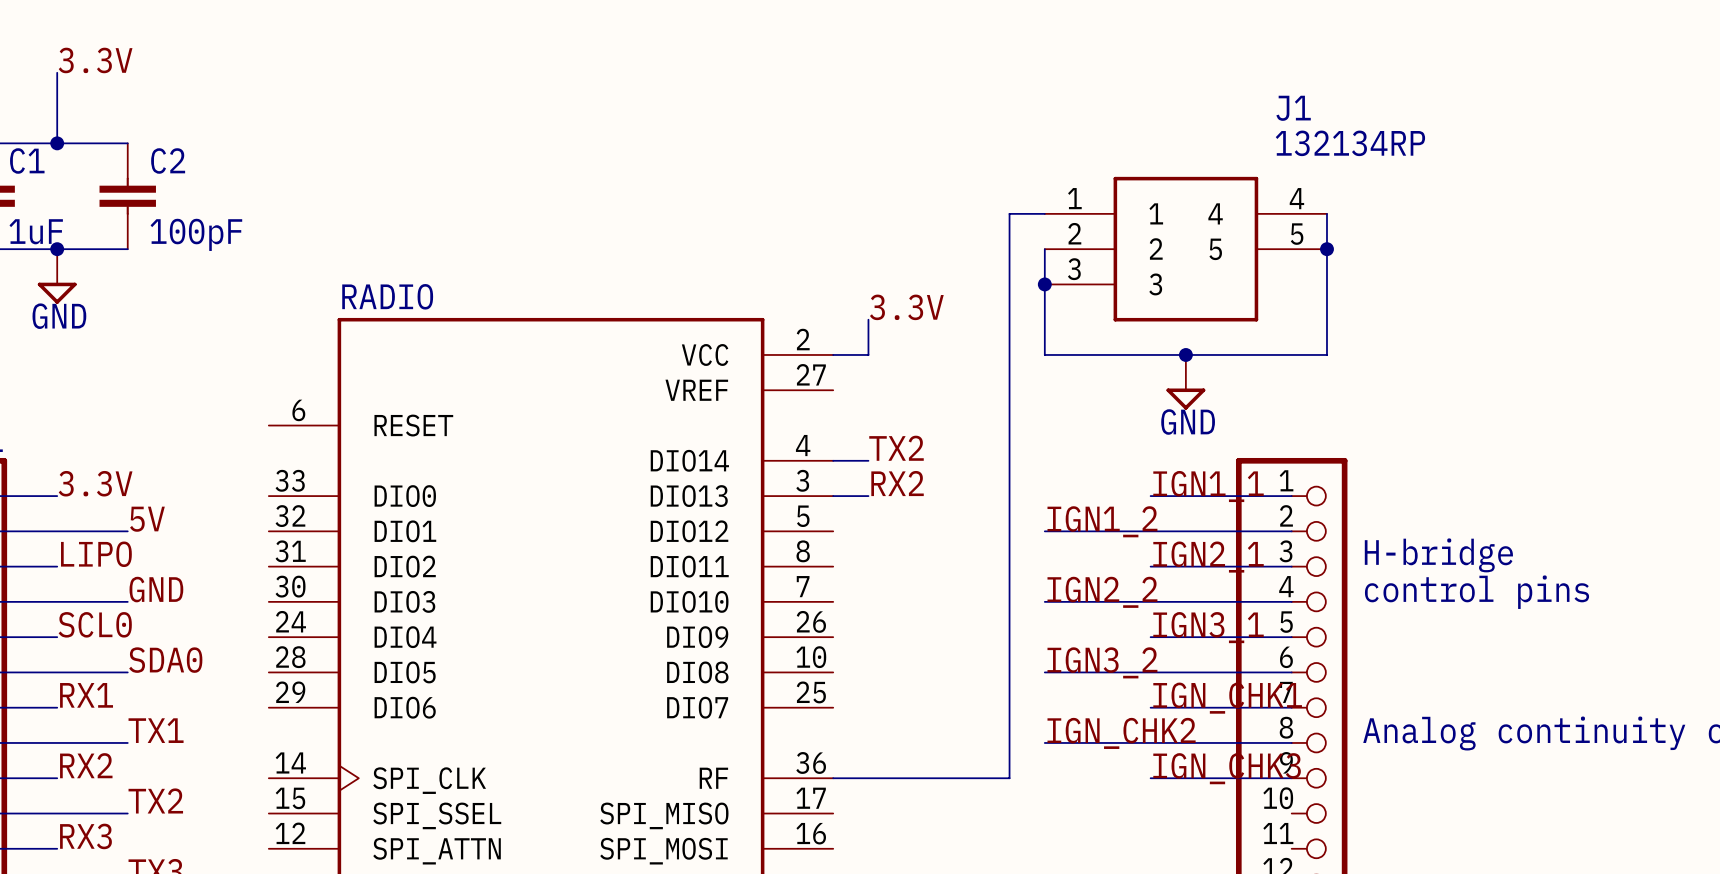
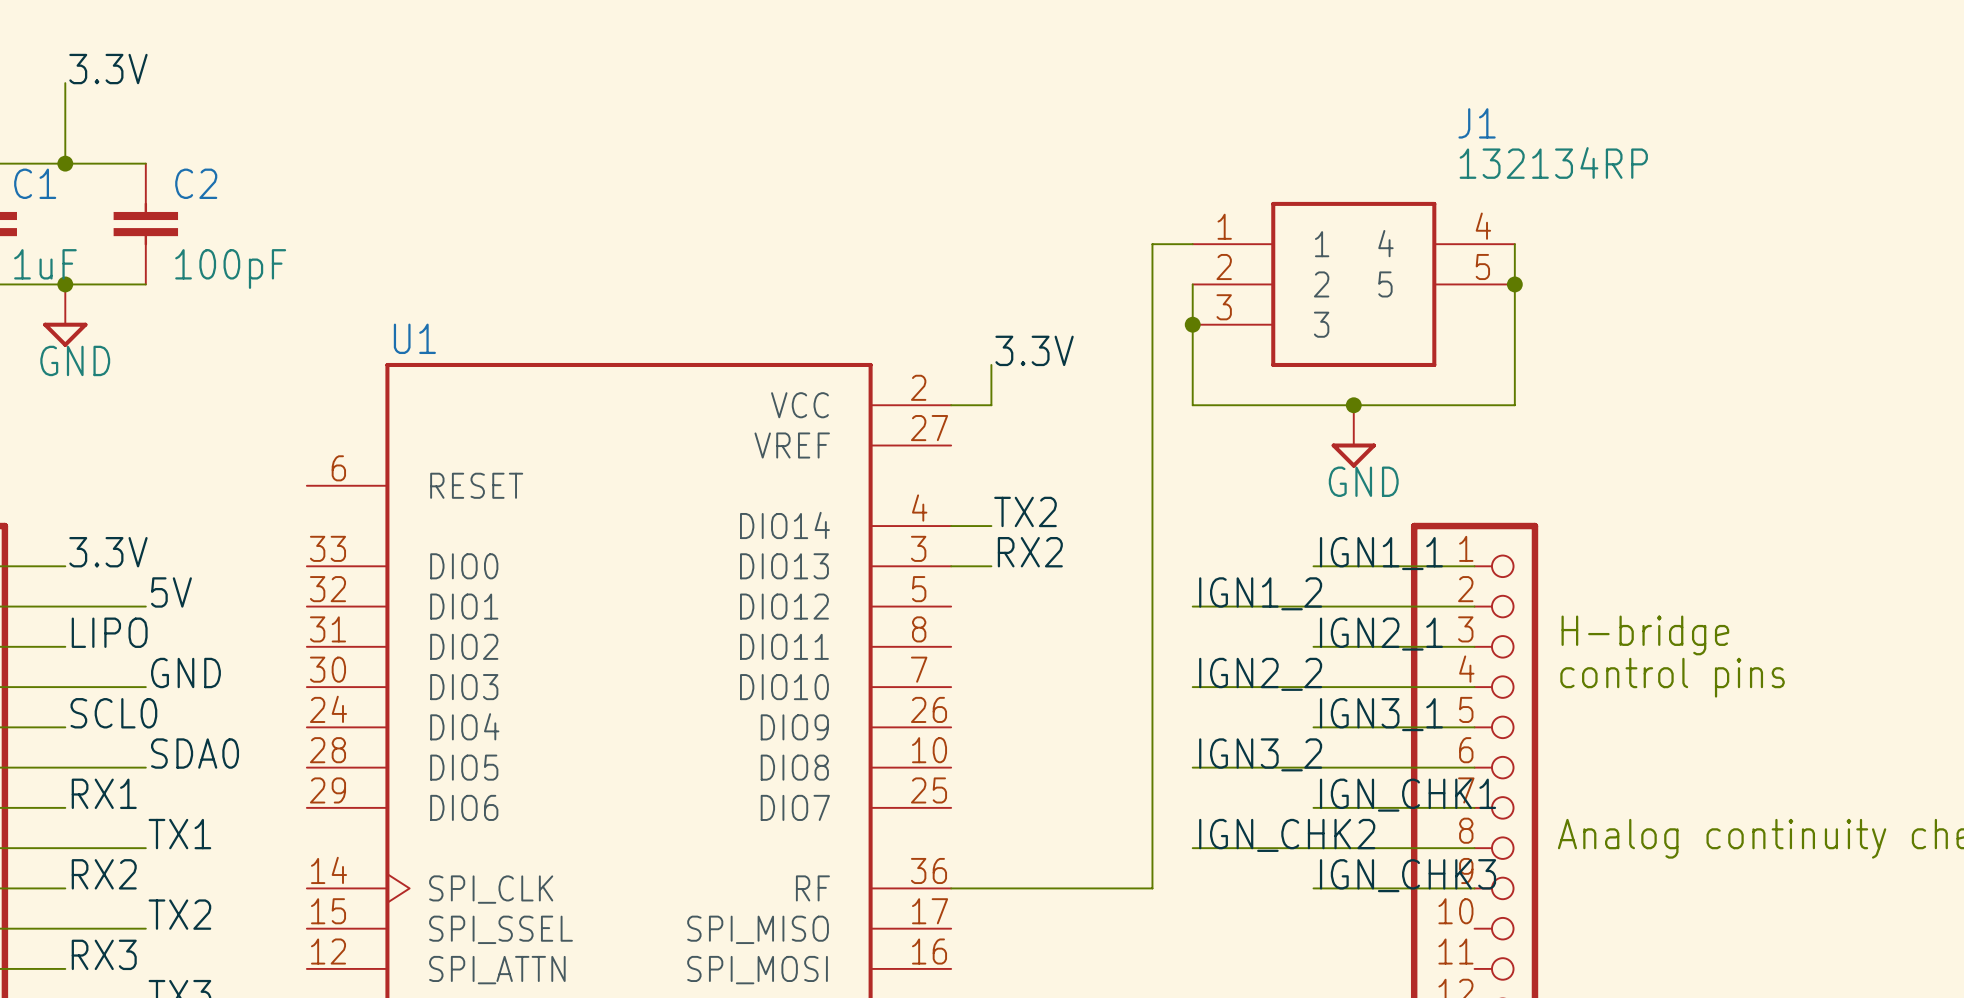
RADIO name: RADIO (387, 296) -> U1 (414, 338)

